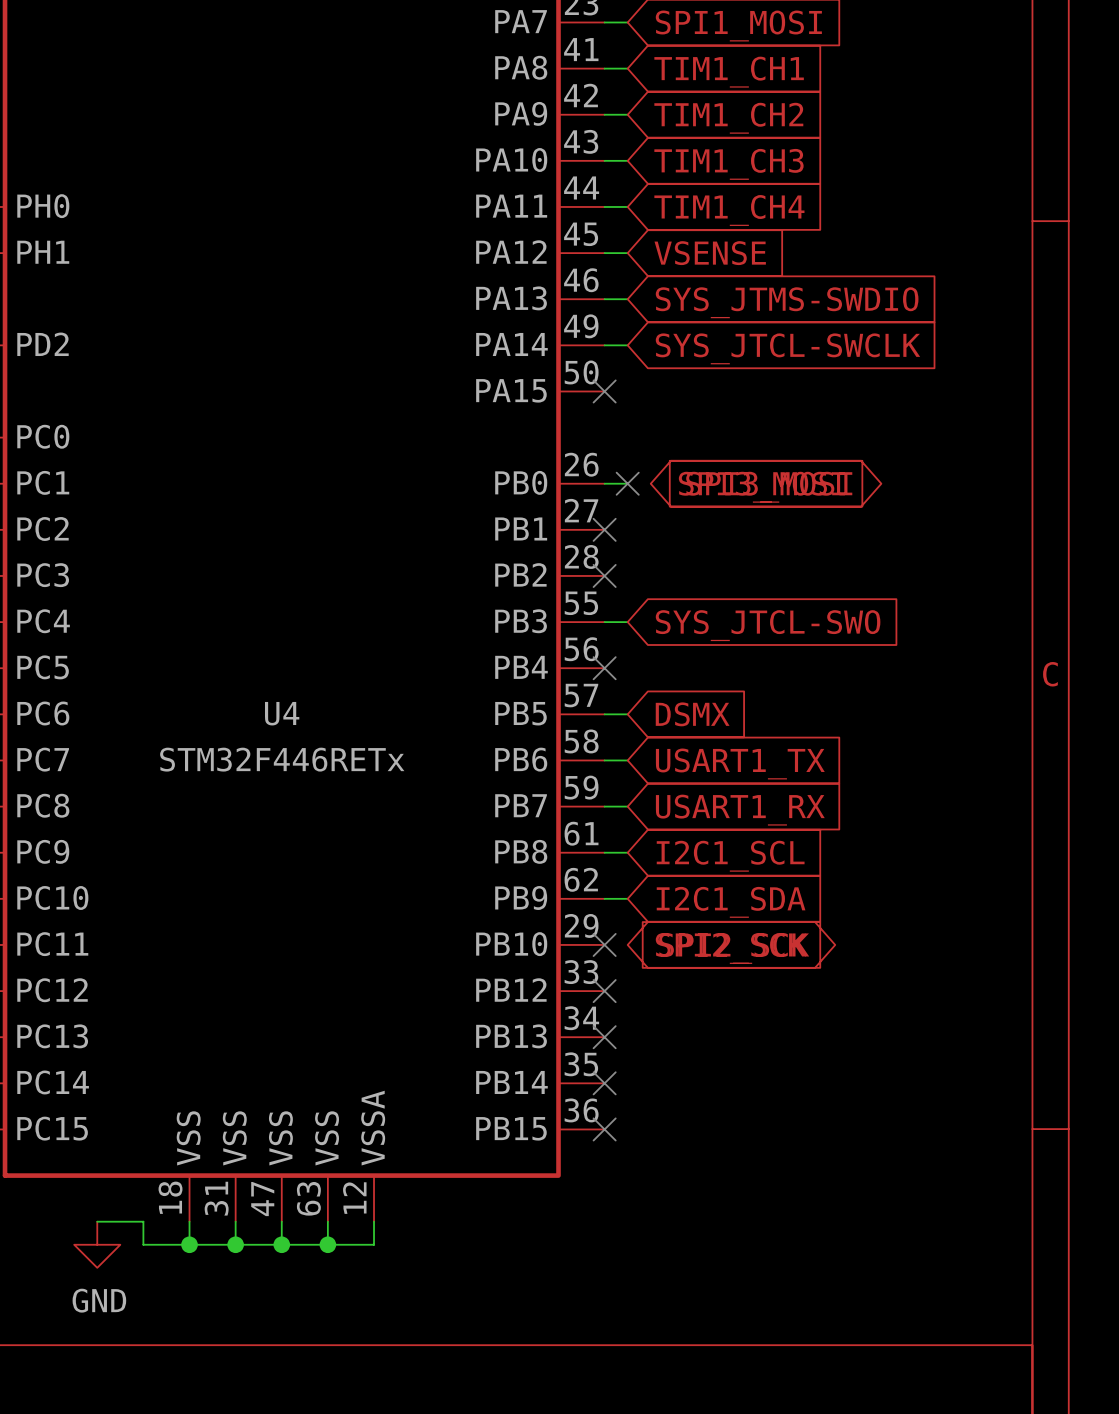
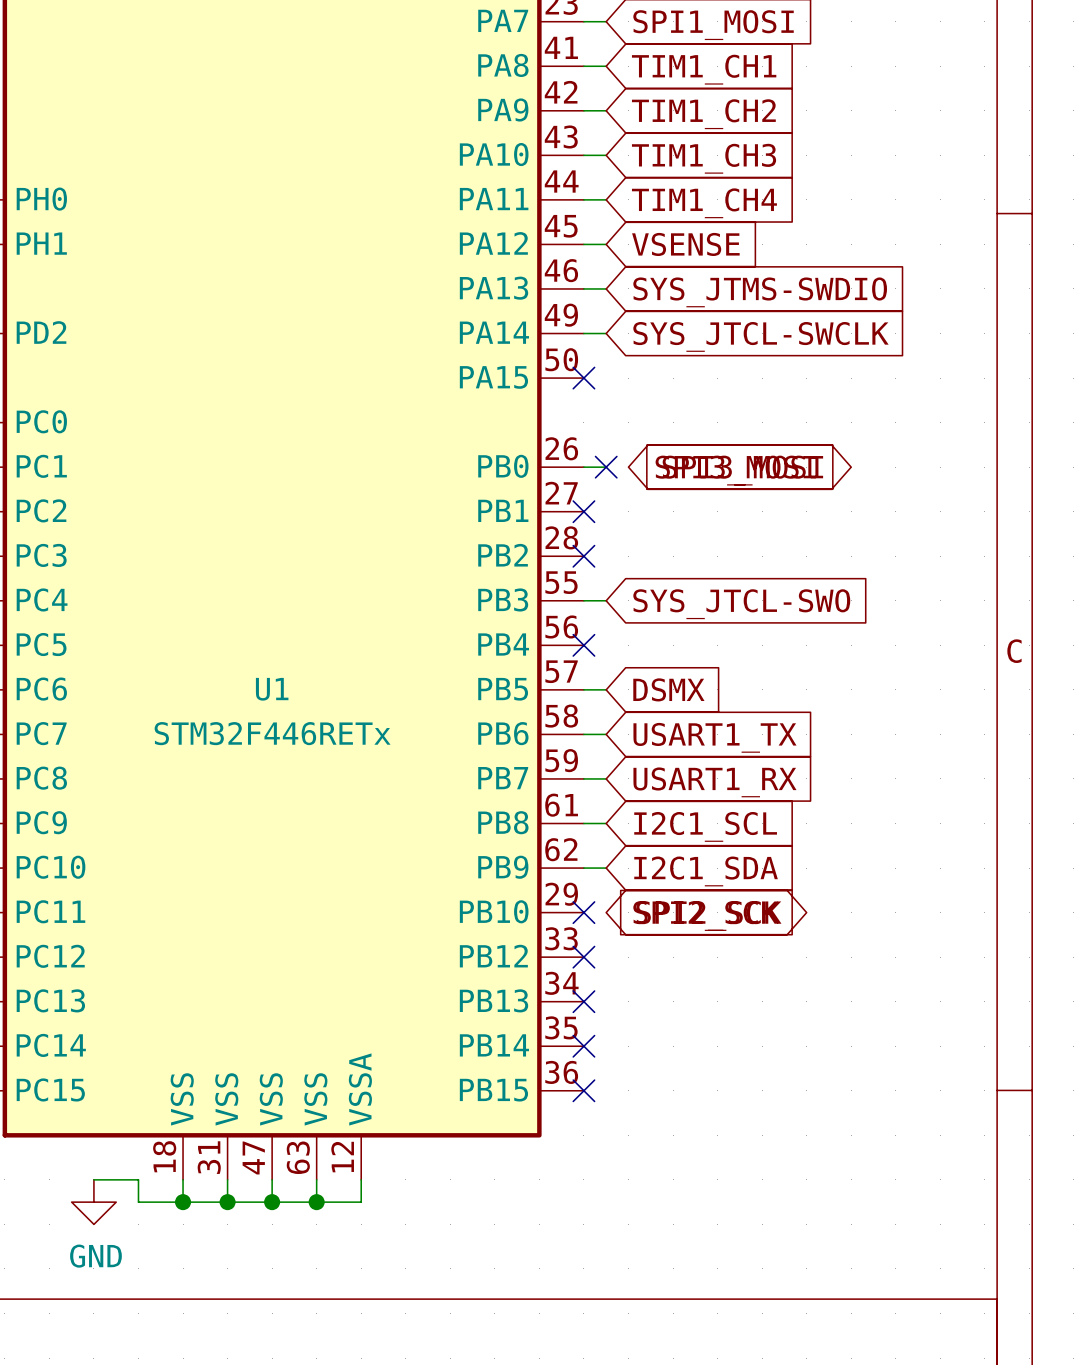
U4 name: U4 (282, 713) -> U1 (272, 689)

